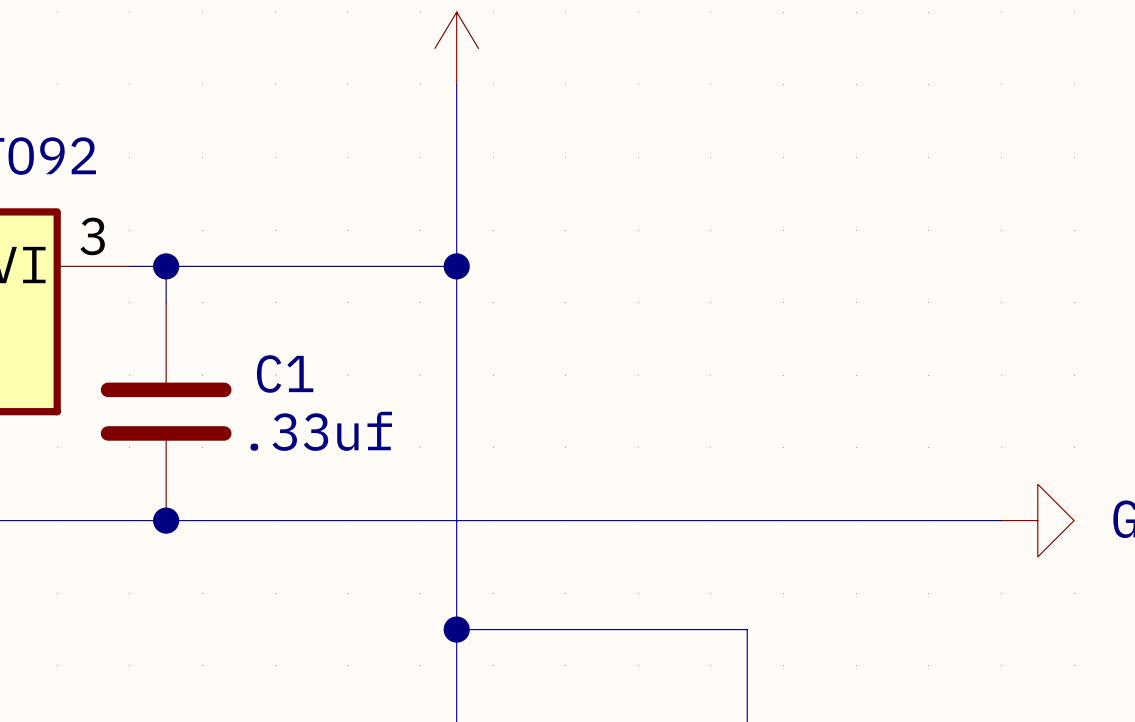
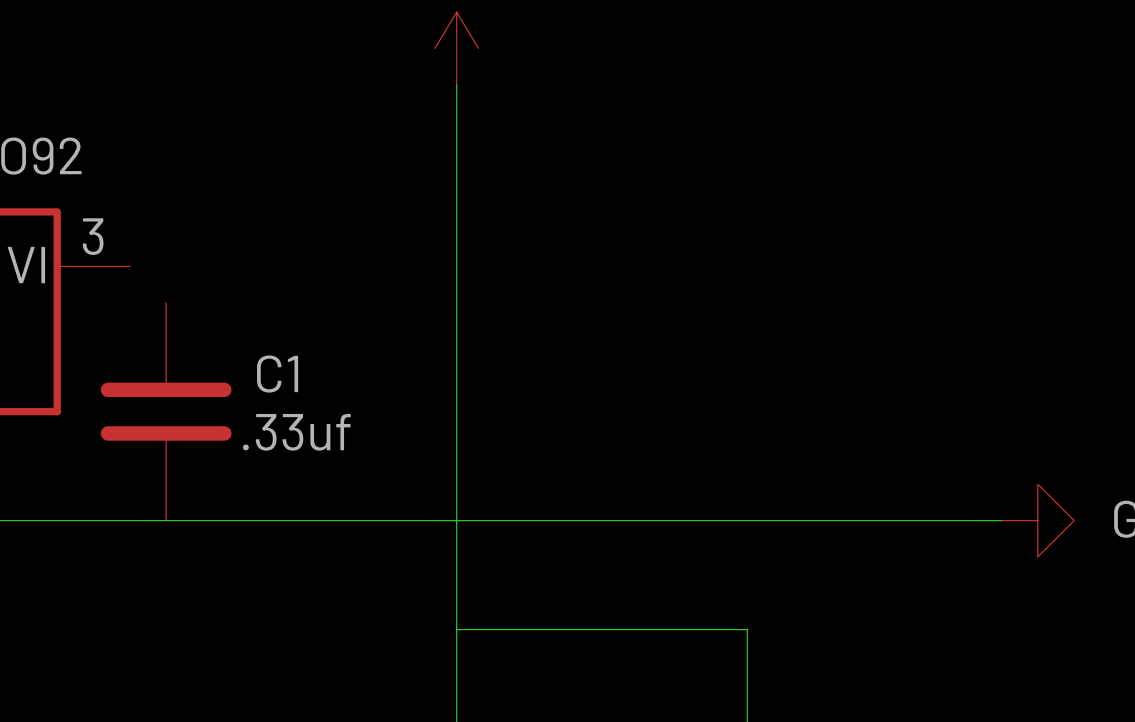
wire: (129, 266) (456, 266) -> none
wire: (166, 266) (166, 302) -> none
junction: (166, 266) -> none
junction: (456, 266) -> none
junction: (166, 520) -> none
junction: (456, 629) -> none

